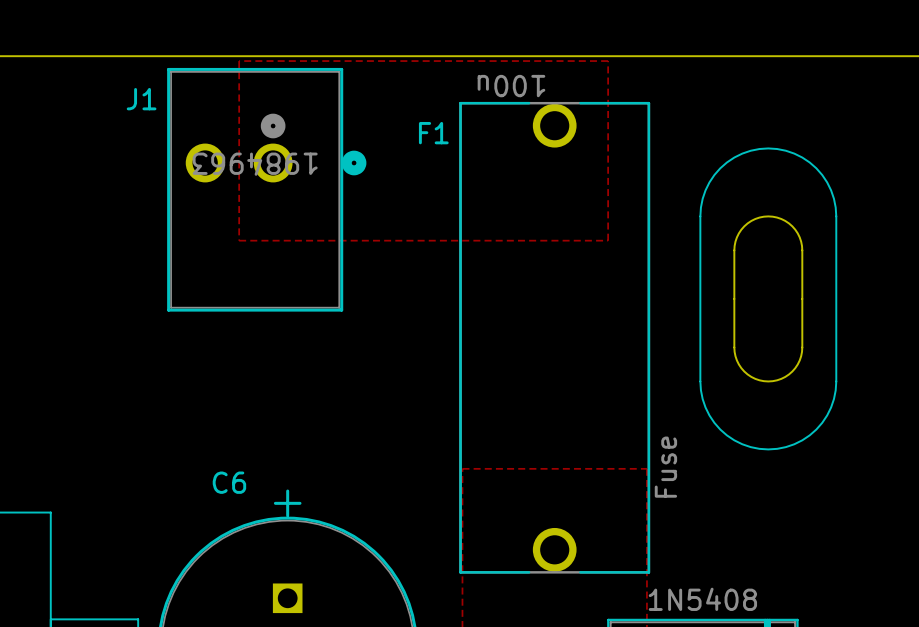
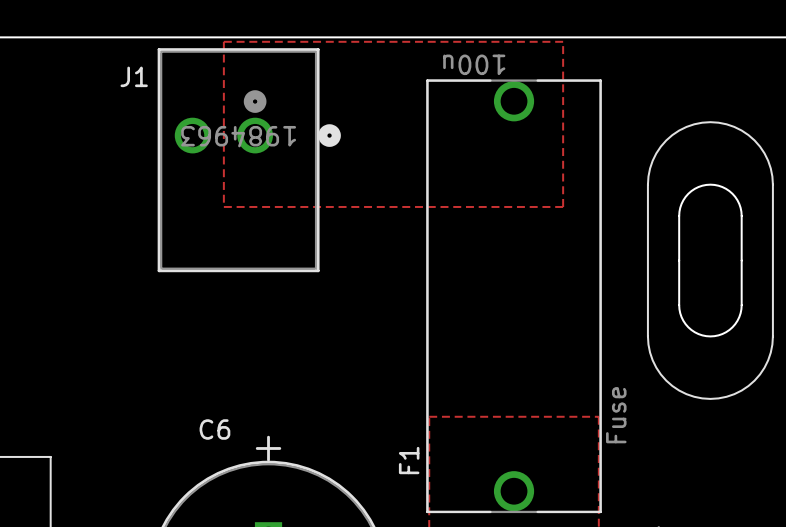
F1 name rotation: 0° (433, 133) -> 90° counterclockwise (409, 460)
F1 name position: F1 (433, 133) -> F1 (409, 460)

